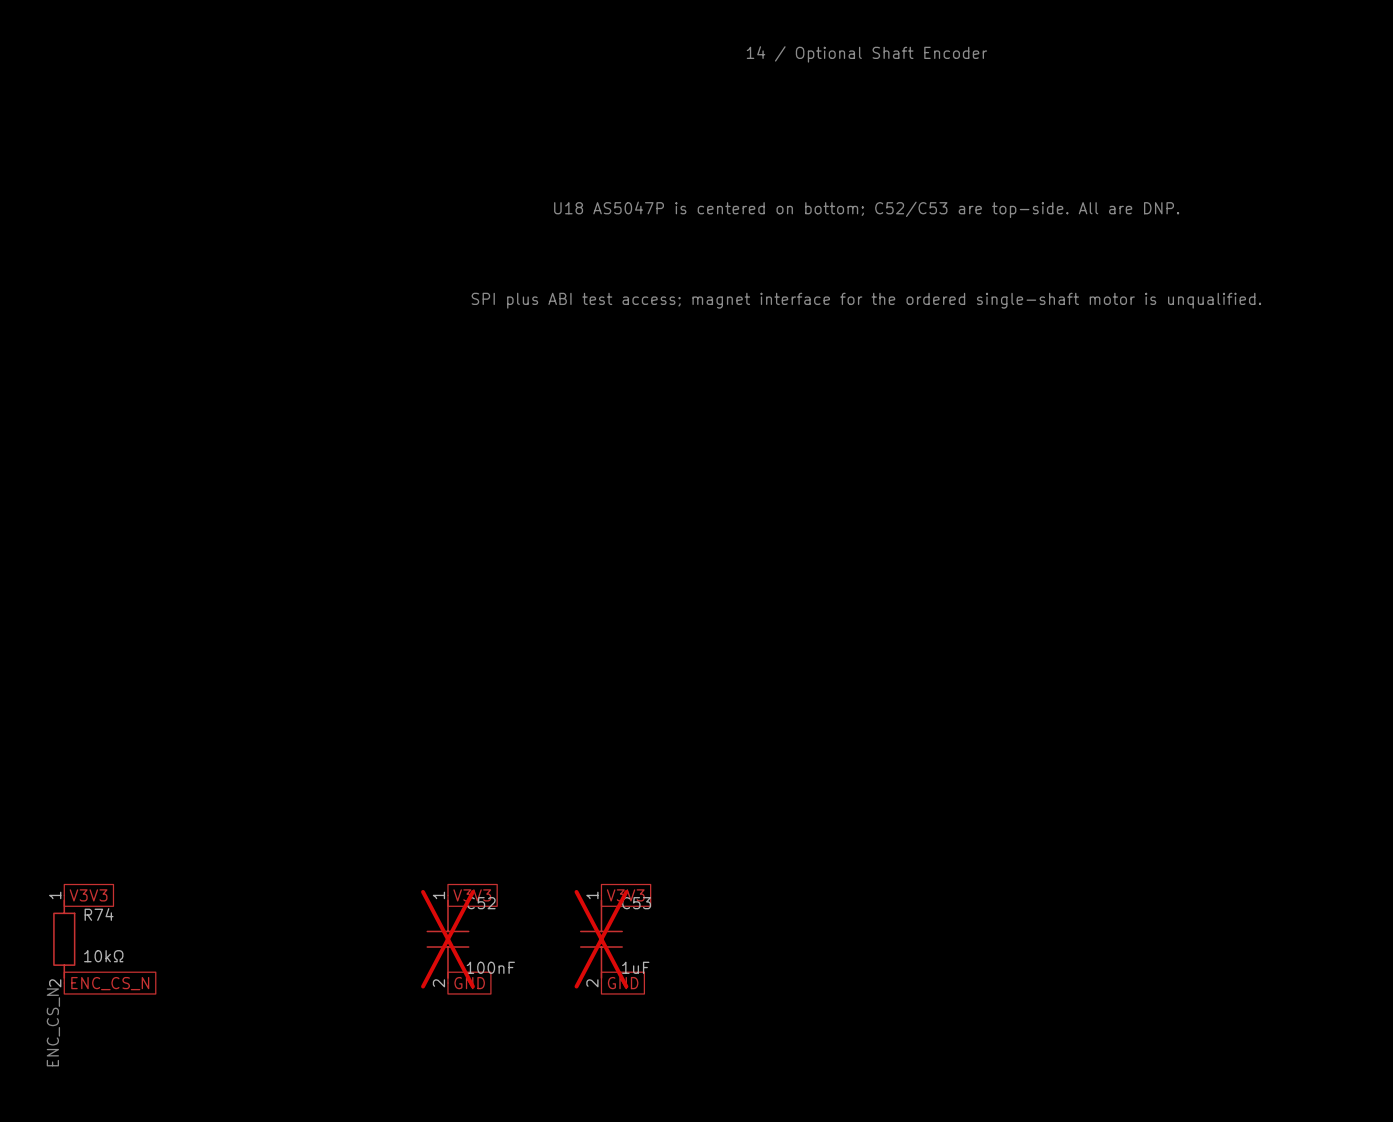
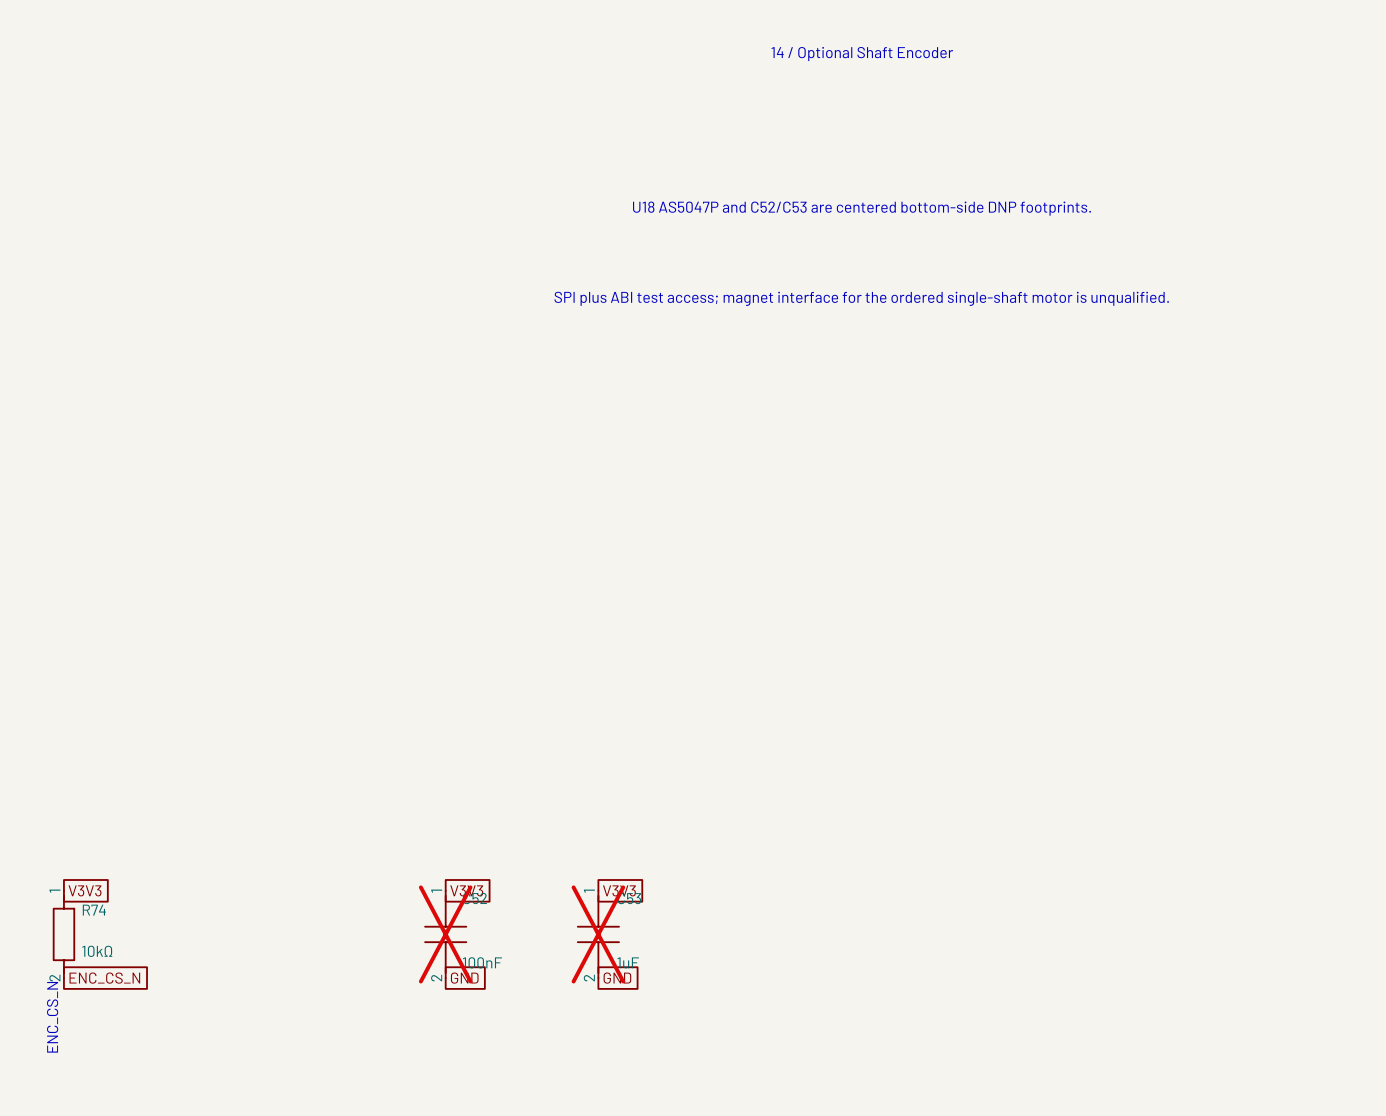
text: U18 AS5047P is centered on bottom; C52/C53 are top-side. All are DNP. (866, 209) -> U18 AS5047P and C52/C53 are centered bottom-side DNP footprints. (862, 208)

